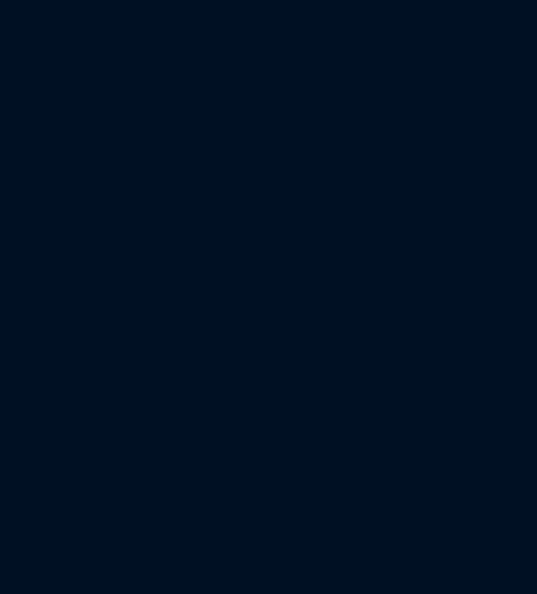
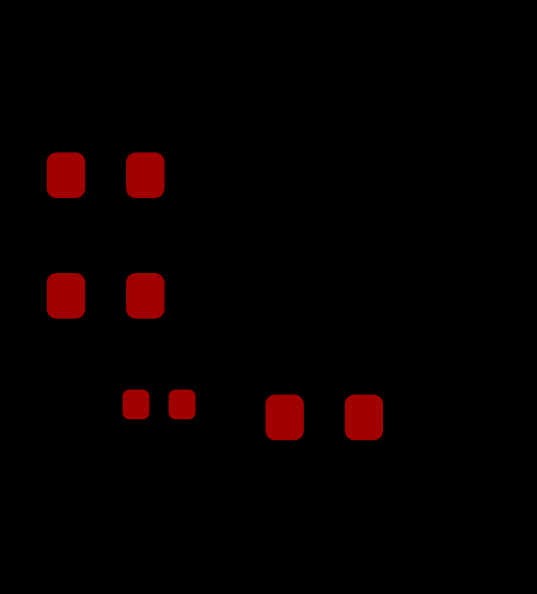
part: none -> (105, 175)
part: none -> (105, 295)
part: none -> (158, 404)
part: none -> (324, 417)

